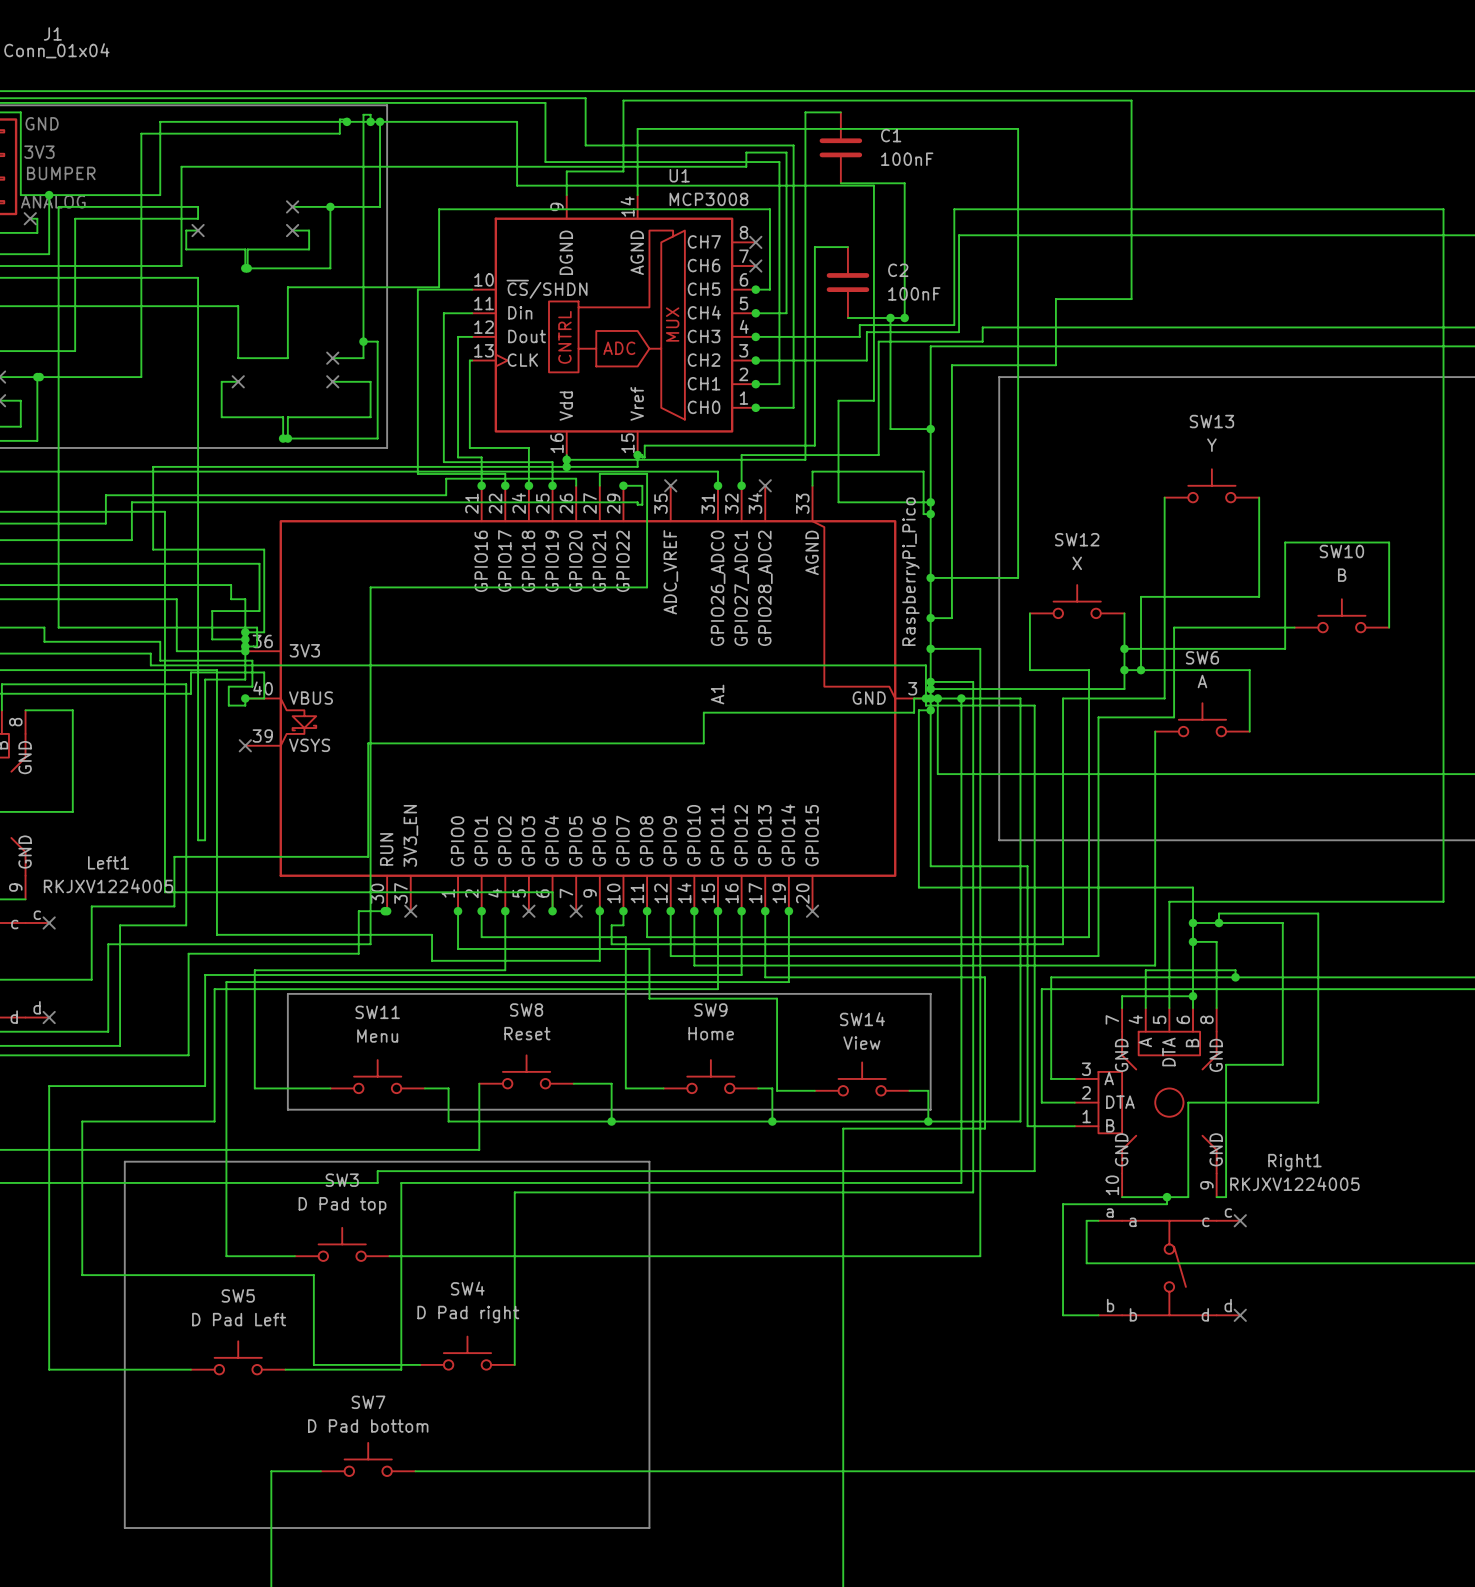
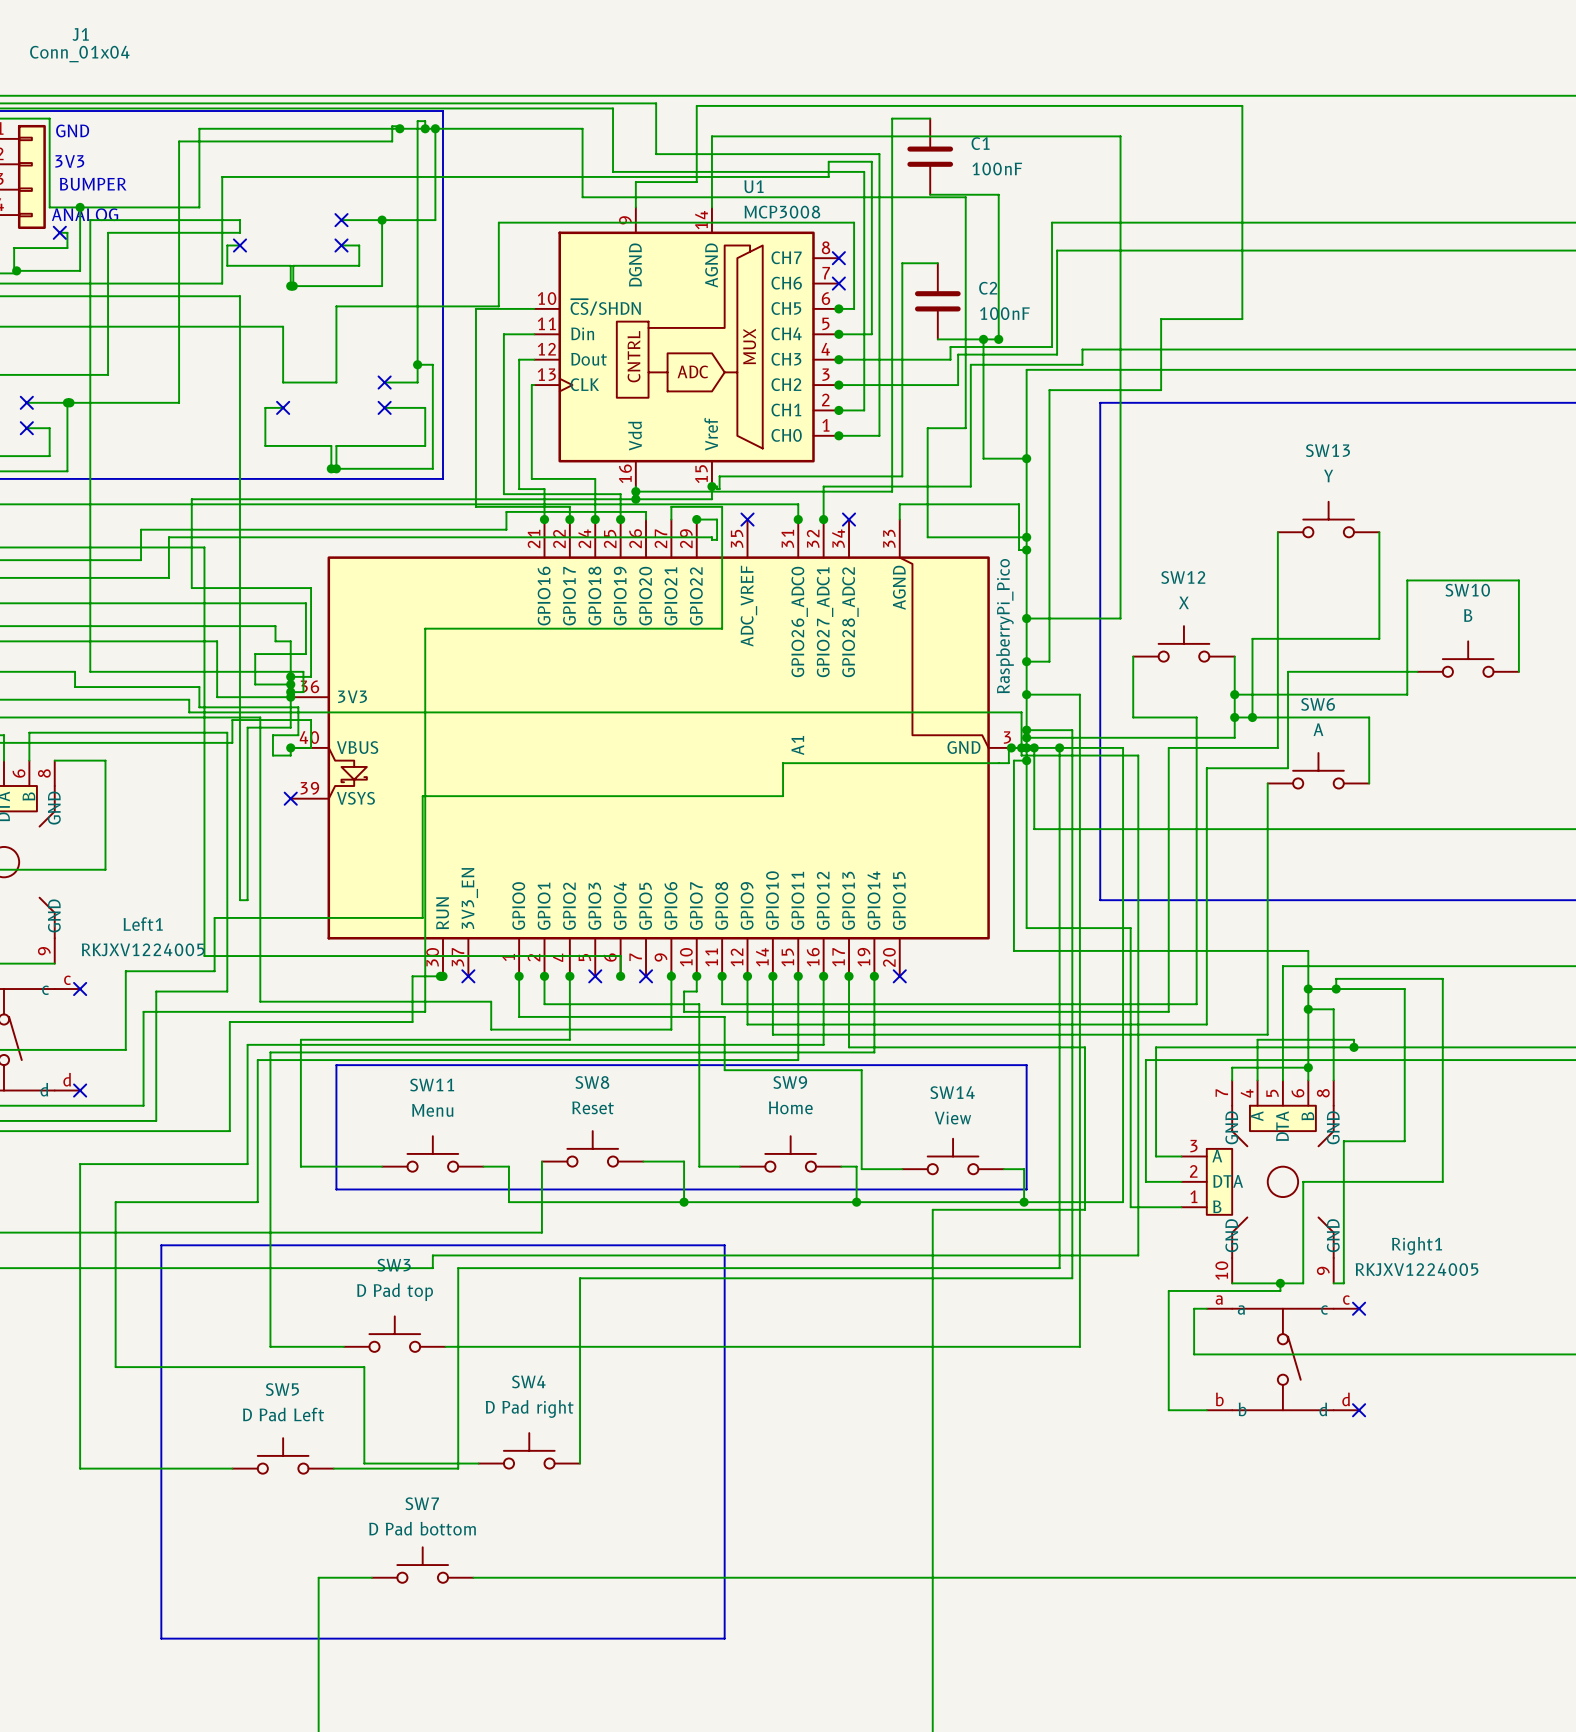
junction: none -> (1011, 747)

